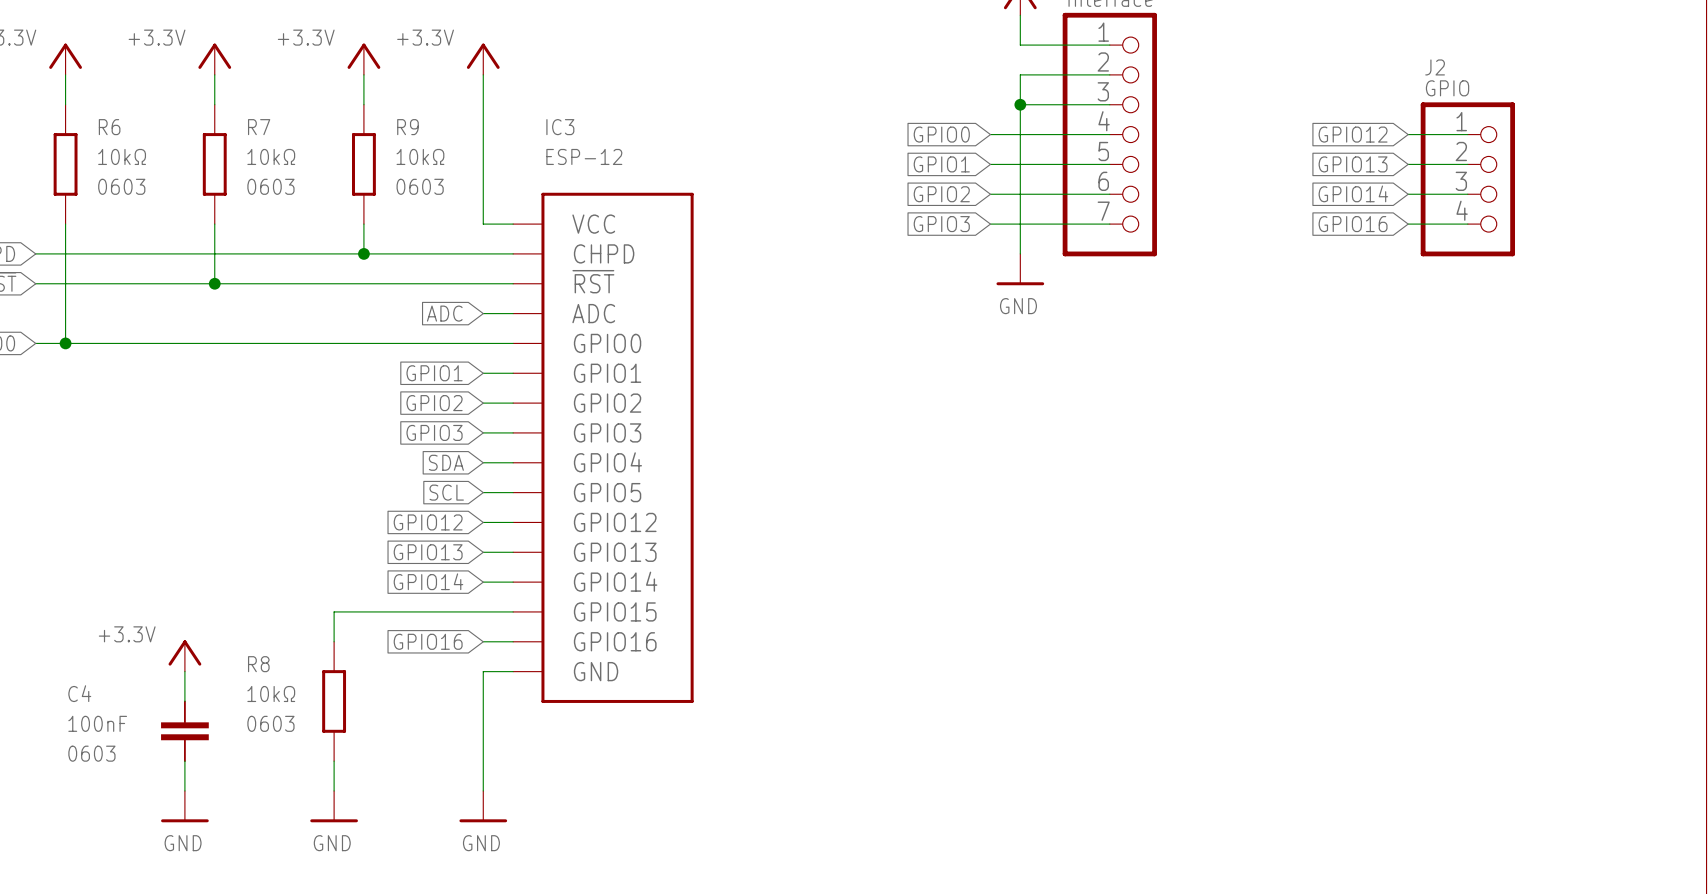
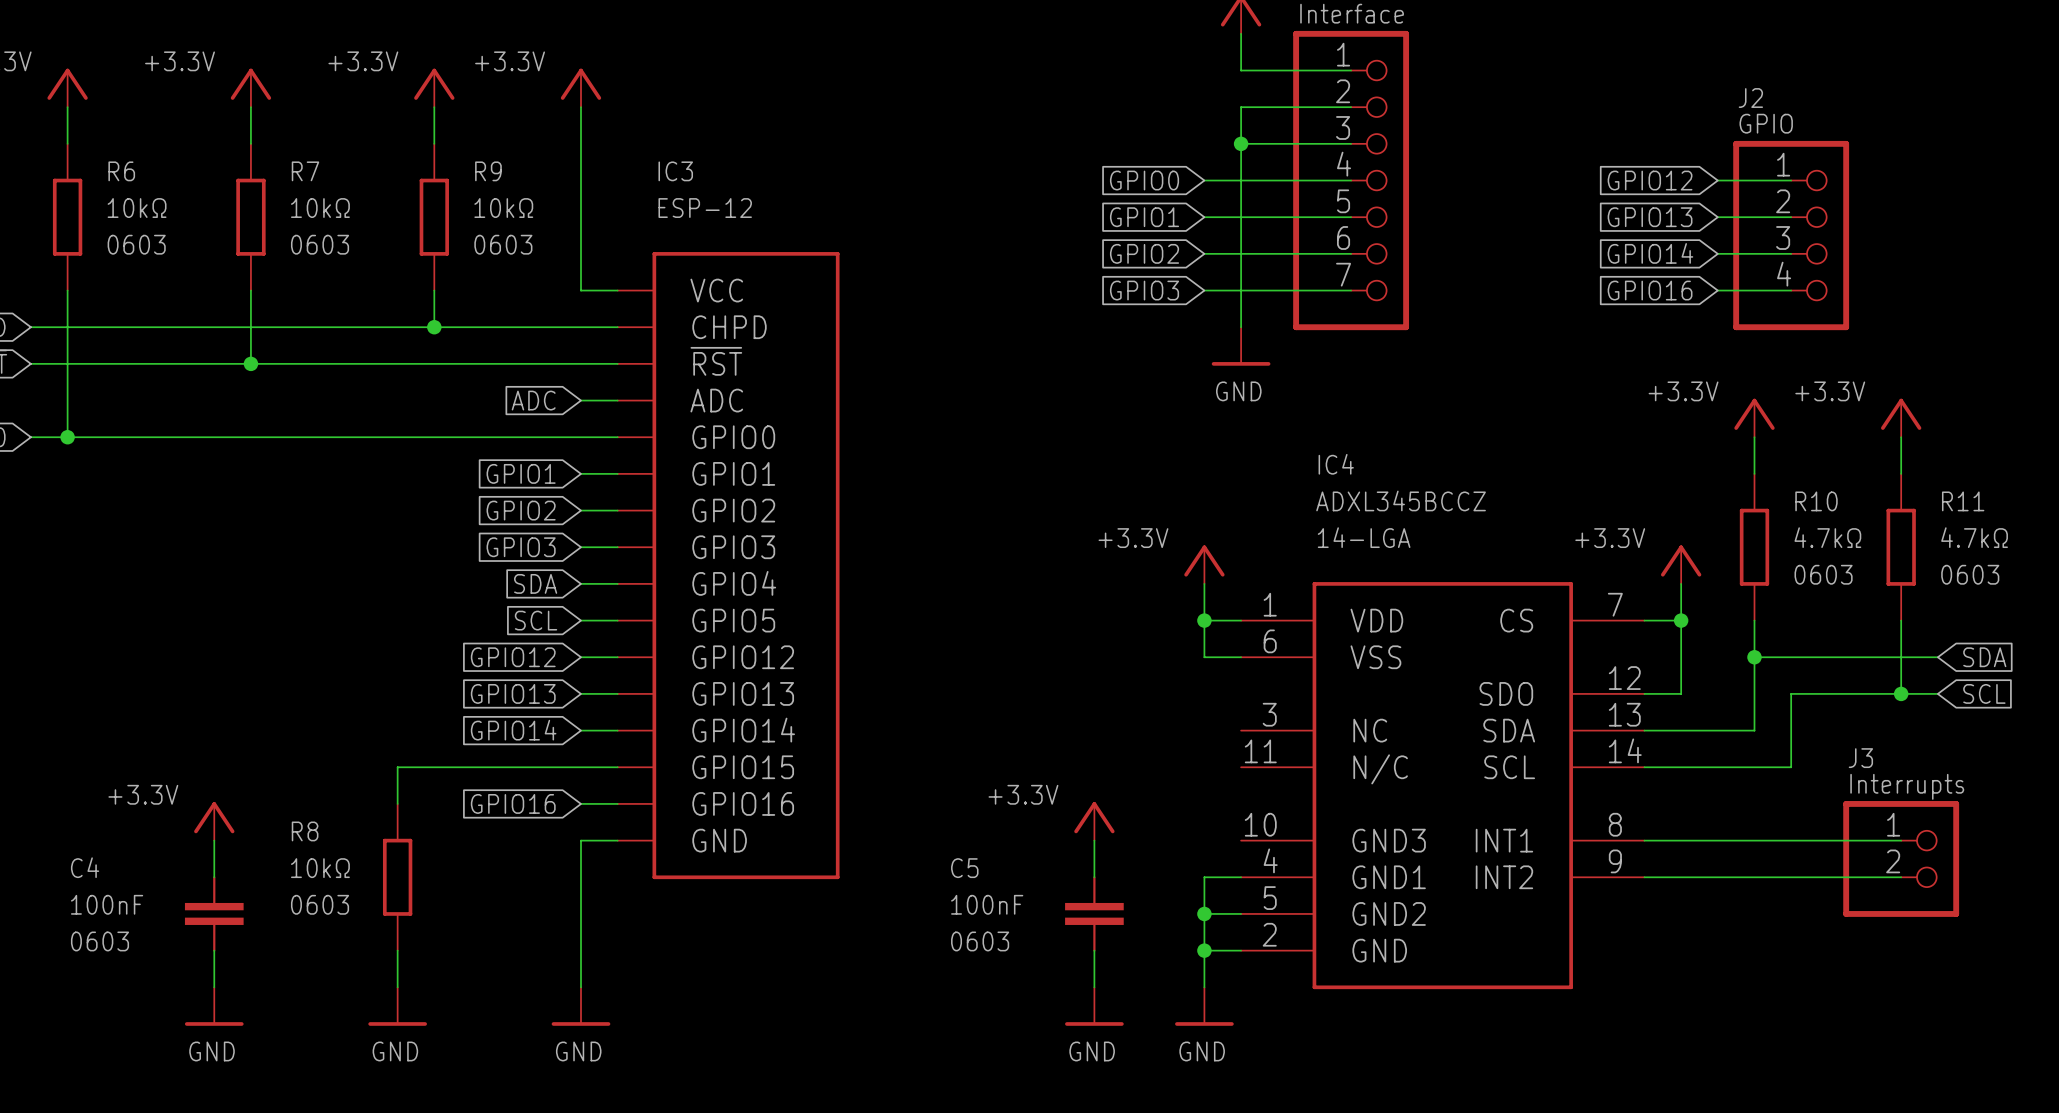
power symbol: none -> +3.3V (1754, 417)
power symbol: none -> +3.3V (1901, 417)
wire: none -> (1754, 437) (1754, 473)
wire: none -> (1901, 437) (1901, 473)
R10: none -> 4.7kΩ (1754, 547)
R11: none -> 4.7kΩ (1901, 547)
power symbol: none -> +3.3V (1204, 564)
power symbol: none -> +3.3V (1681, 564)
wire: none -> (1204, 583) (1204, 657) (1241, 657)
wire: none -> (1681, 583) (1681, 693) (1644, 693)
wire: none -> (1204, 620) (1241, 620)
junction: none -> (1204, 620)
wire: none -> (1644, 620) (1681, 620)
junction: none -> (1681, 620)
wire: none -> (1754, 620) (1754, 730) (1644, 730)
wire: none -> (1901, 620) (1901, 693)
wire: none -> (1754, 657) (1937, 657)
junction: none -> (1754, 657)
global label: none -> SDA (1984, 657)
junction: none -> (1901, 693)
wire: none -> (1937, 693) (1791, 693) (1791, 767) (1644, 767)
global label: none -> SCL (1984, 693)
IC4: none -> ADXL345BCCZ (1442, 785)
power symbol: none -> +3.3V (1094, 821)
wire: none -> (1094, 840) (1094, 877)
wire: none -> (1644, 840) (1901, 840)
J3: none -> Interrupts (1901, 858)
wire: none -> (1241, 877) (1204, 877) (1204, 987)
wire: none -> (1644, 877) (1901, 877)
C5: none -> 100nF (1094, 913)
wire: none -> (1204, 913) (1241, 913)
junction: none -> (1204, 913)
wire: none -> (1094, 950) (1094, 987)
wire: none -> (1204, 950) (1241, 950)
junction: none -> (1204, 950)
power symbol: none -> GND (1094, 1006)
power symbol: none -> GND (1204, 1006)

